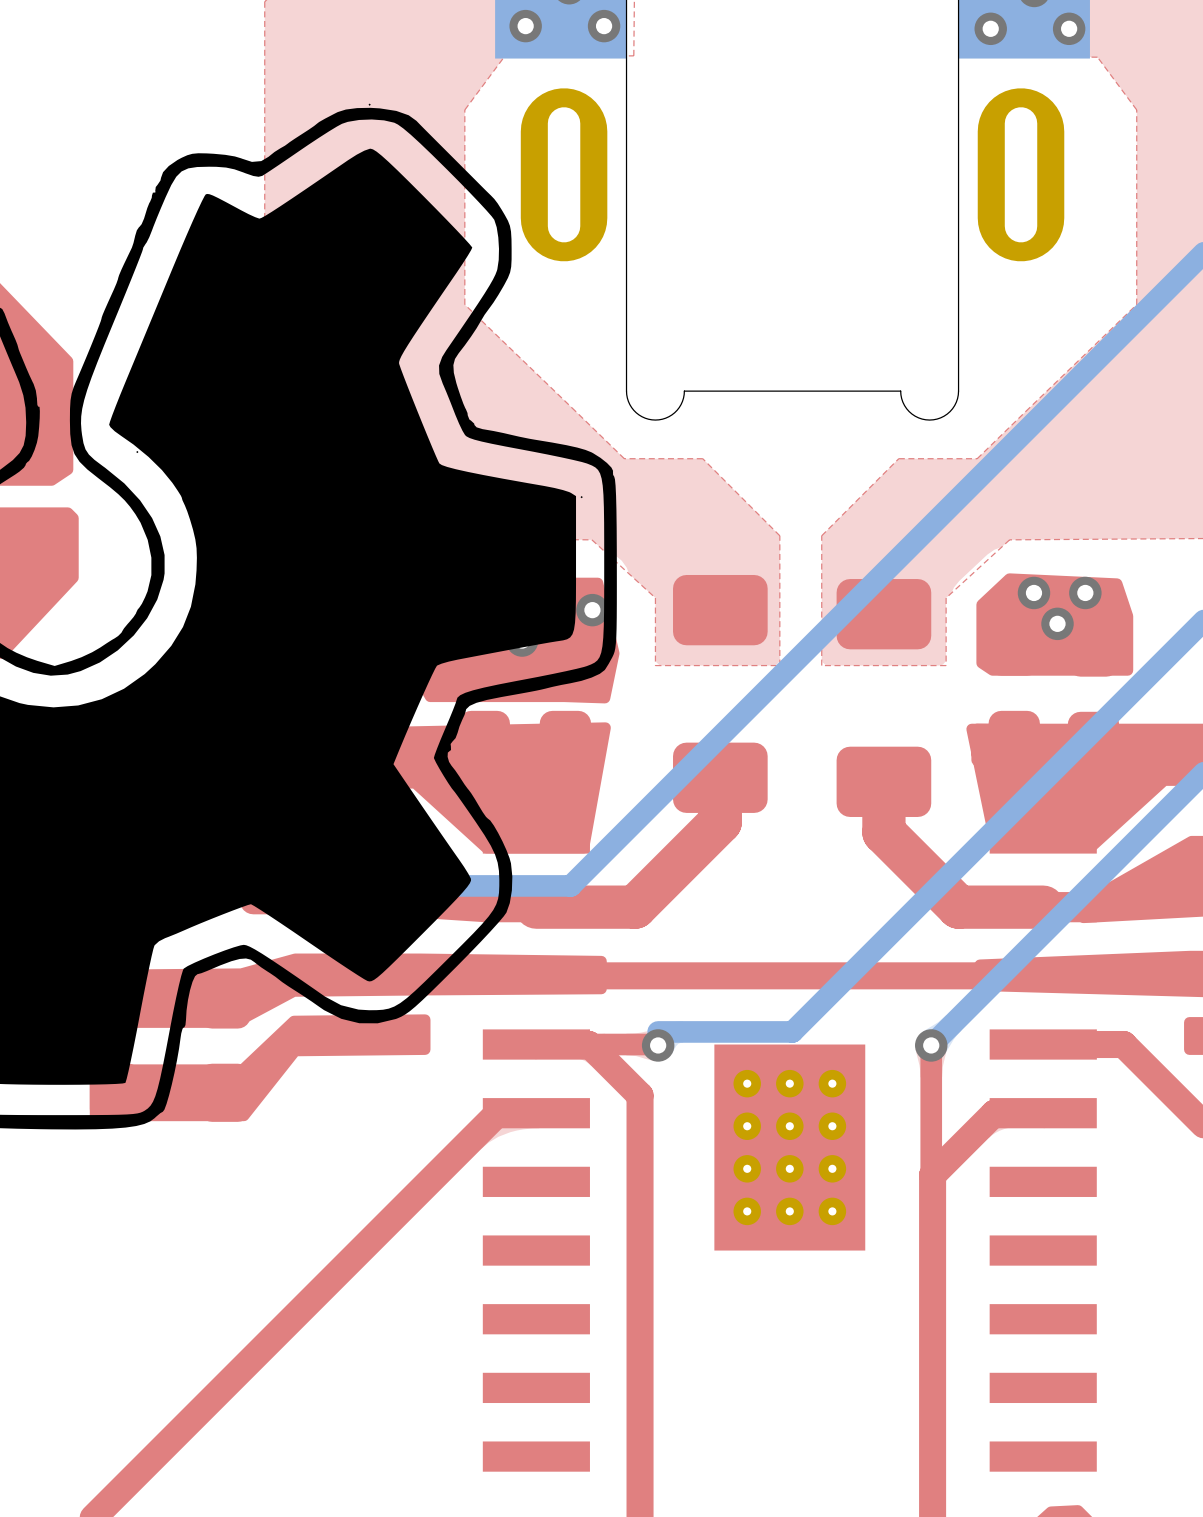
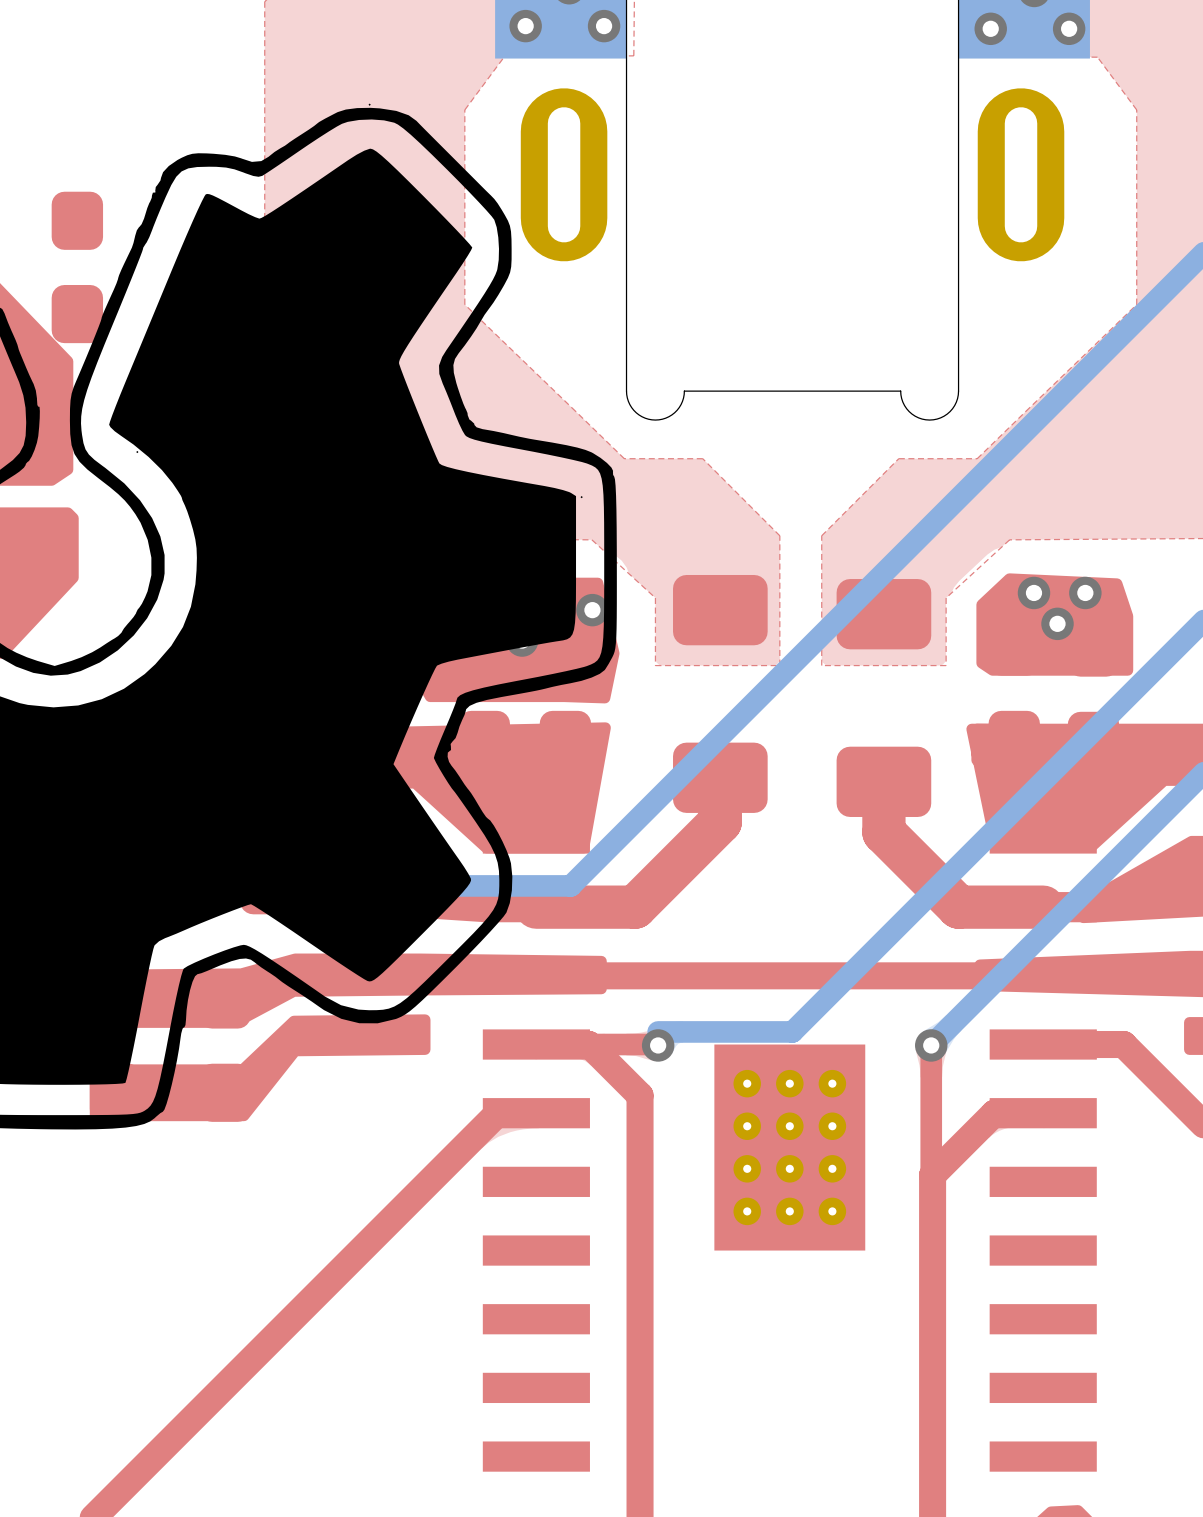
part: none -> (77, 267)

